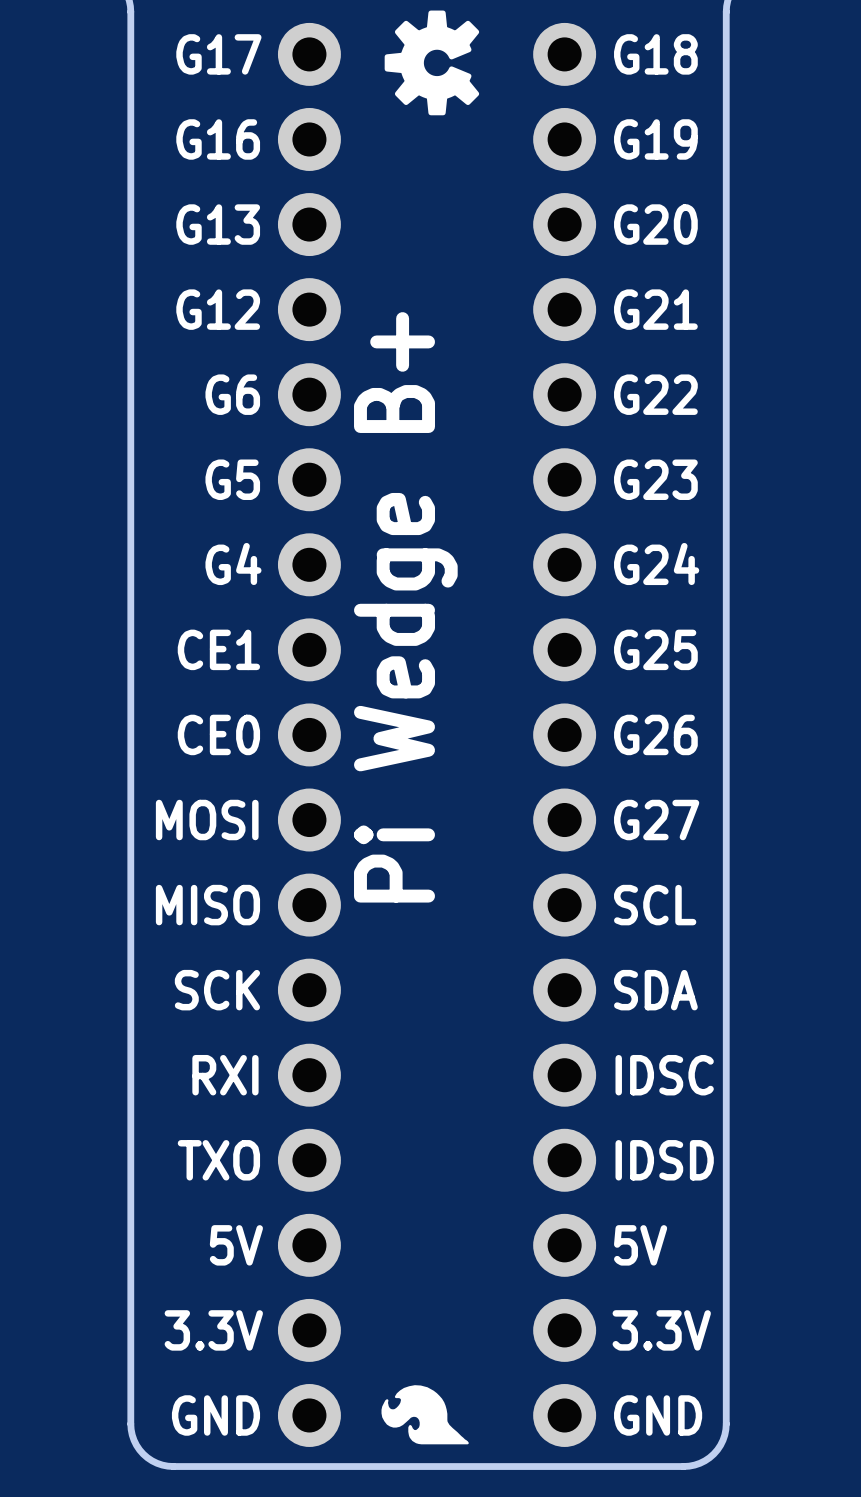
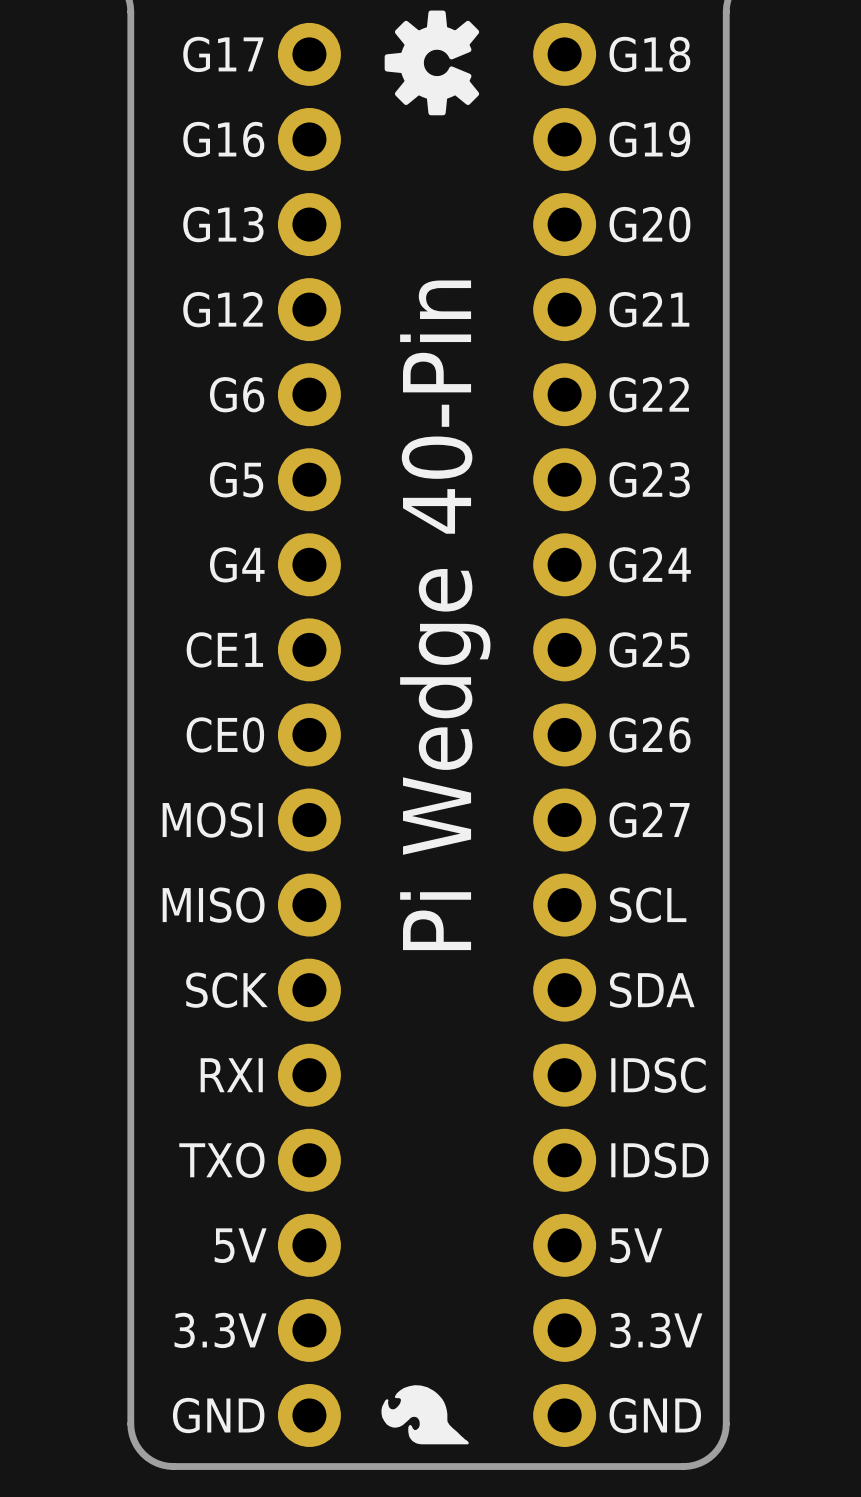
text: Pi Wedge B+ (405, 607) -> Pi Wedge 40-Pin (445, 615)

